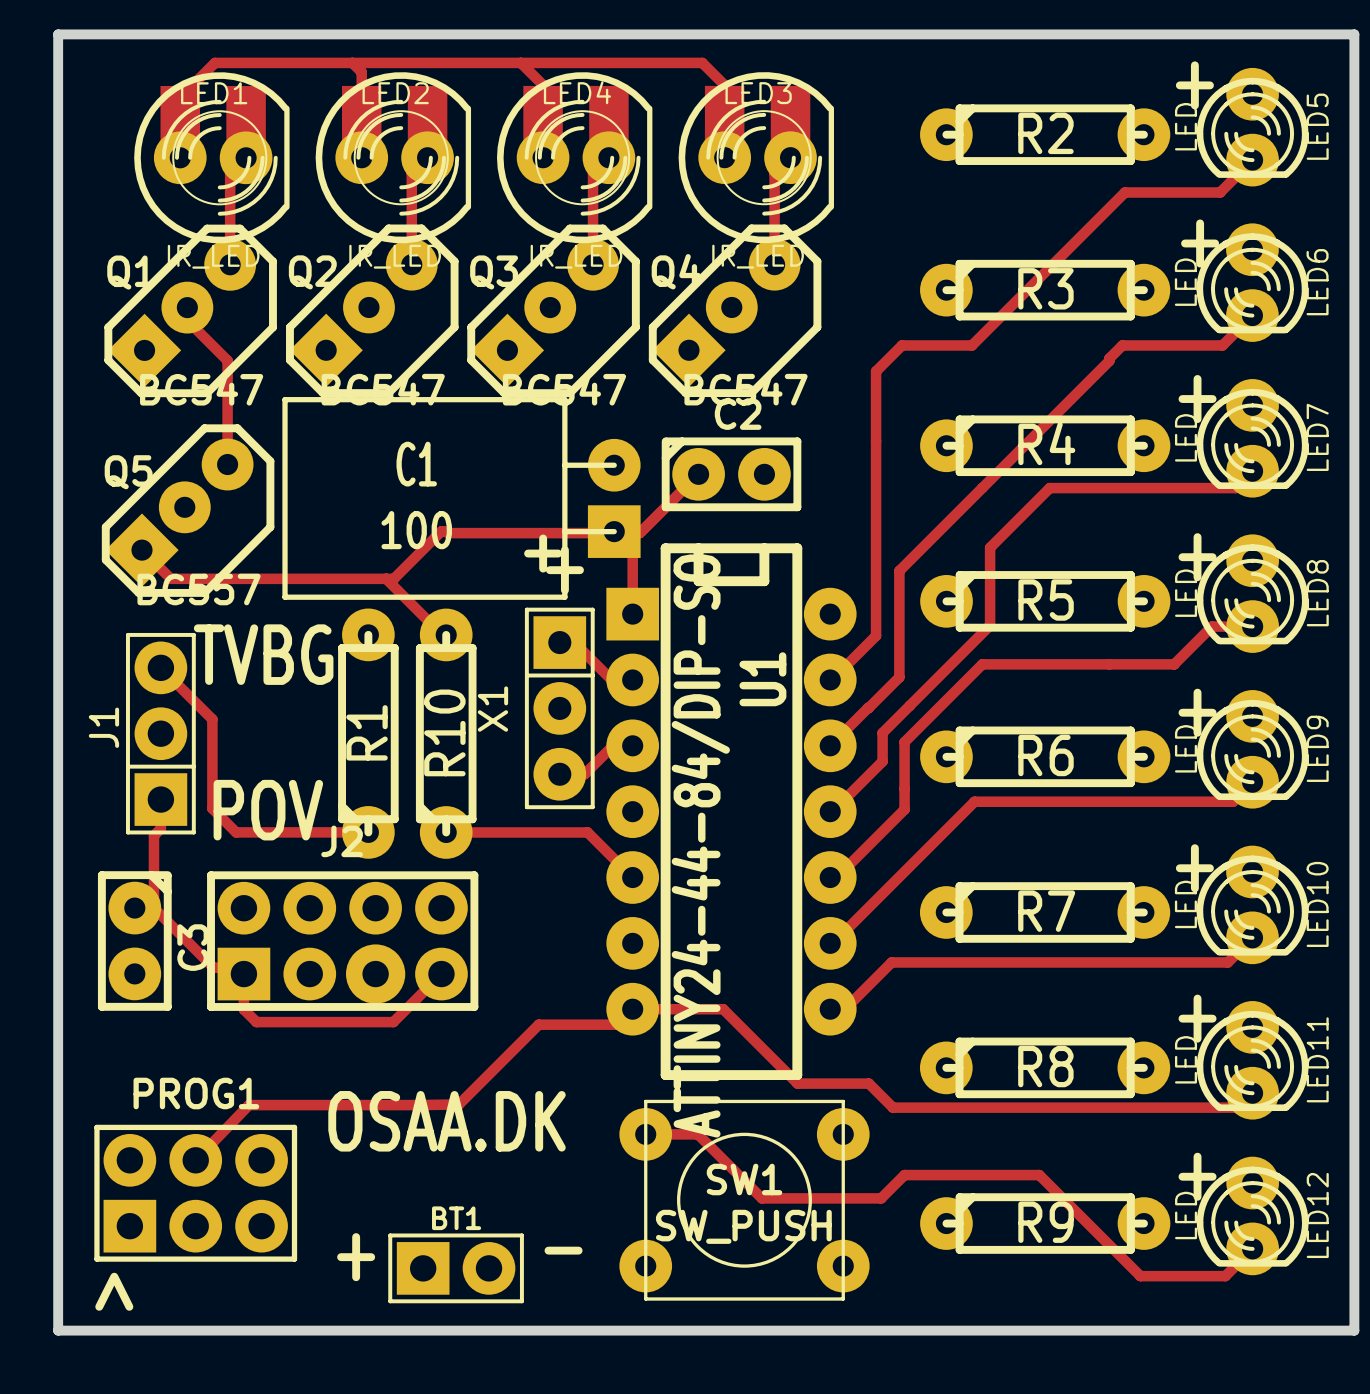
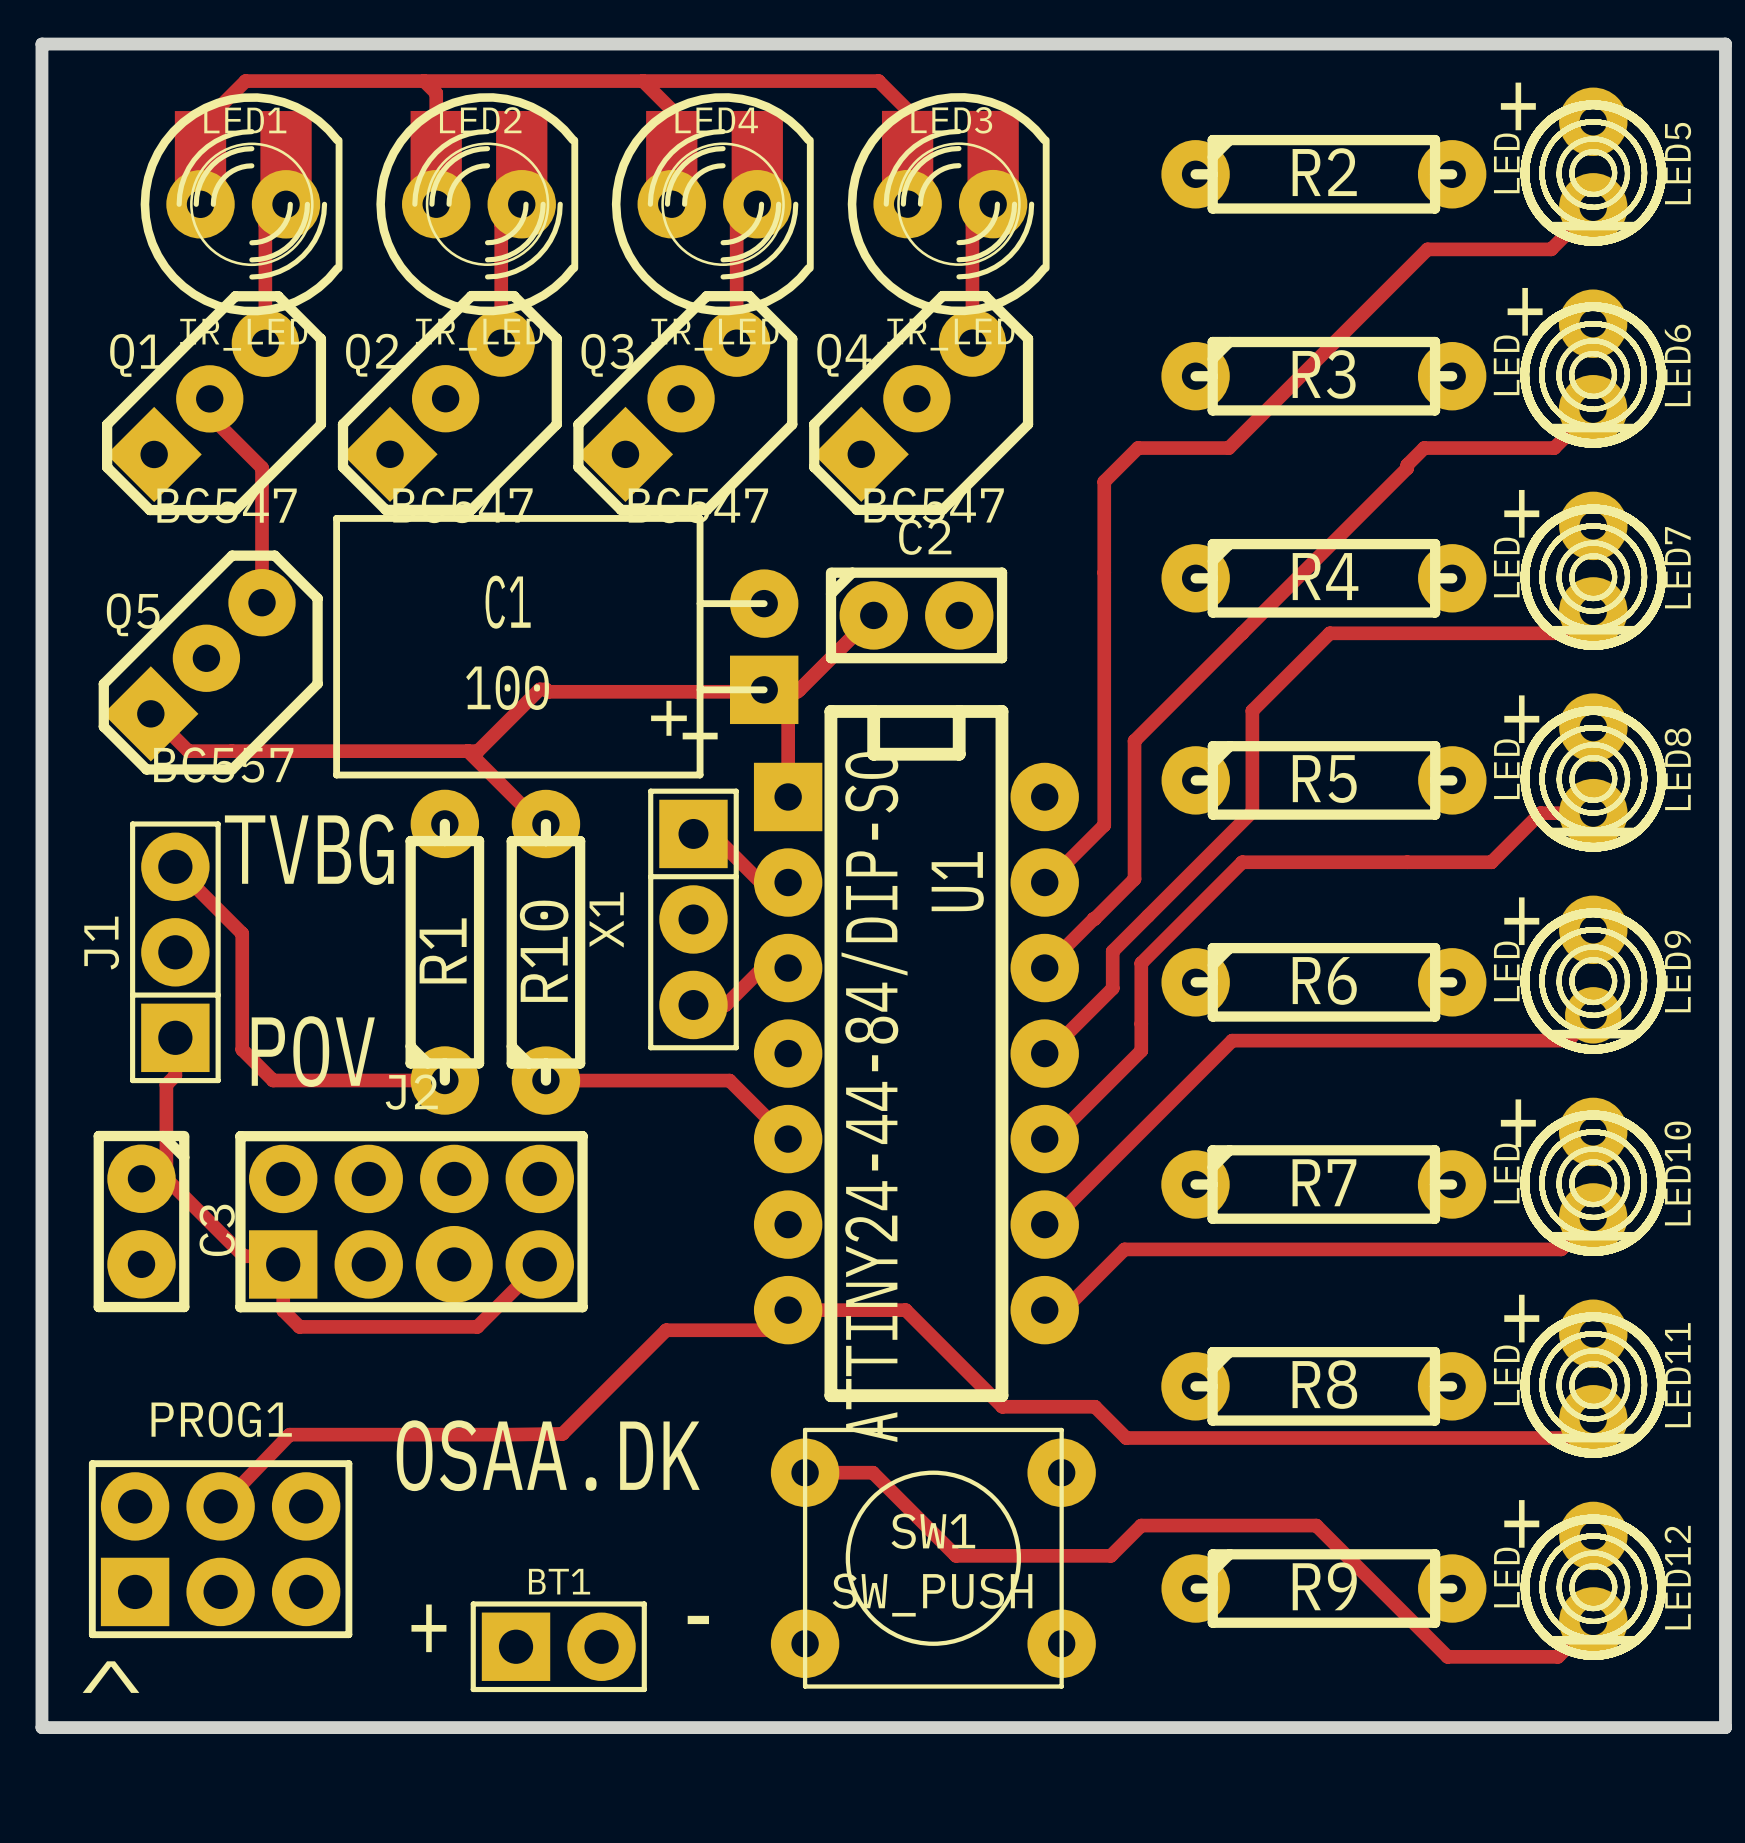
LED5 footprint: [1196, 67, 1309, 187] -> [1520, 87, 1666, 246]
LED6 footprint: [1196, 223, 1309, 342] -> [1520, 289, 1666, 448]
LED7 footprint: [1196, 379, 1309, 498] -> [1520, 491, 1666, 650]
LED8 footprint: [1196, 534, 1309, 653] -> [1520, 693, 1667, 852]
LED9 footprint: [1196, 690, 1309, 809] -> [1520, 895, 1666, 1054]
LED10 footprint: [1196, 845, 1309, 965] -> [1520, 1097, 1666, 1256]
LED11 footprint: [1196, 1001, 1309, 1120] -> [1520, 1299, 1666, 1458]
LED12 footprint: [1196, 1156, 1309, 1276] -> [1520, 1501, 1667, 1660]

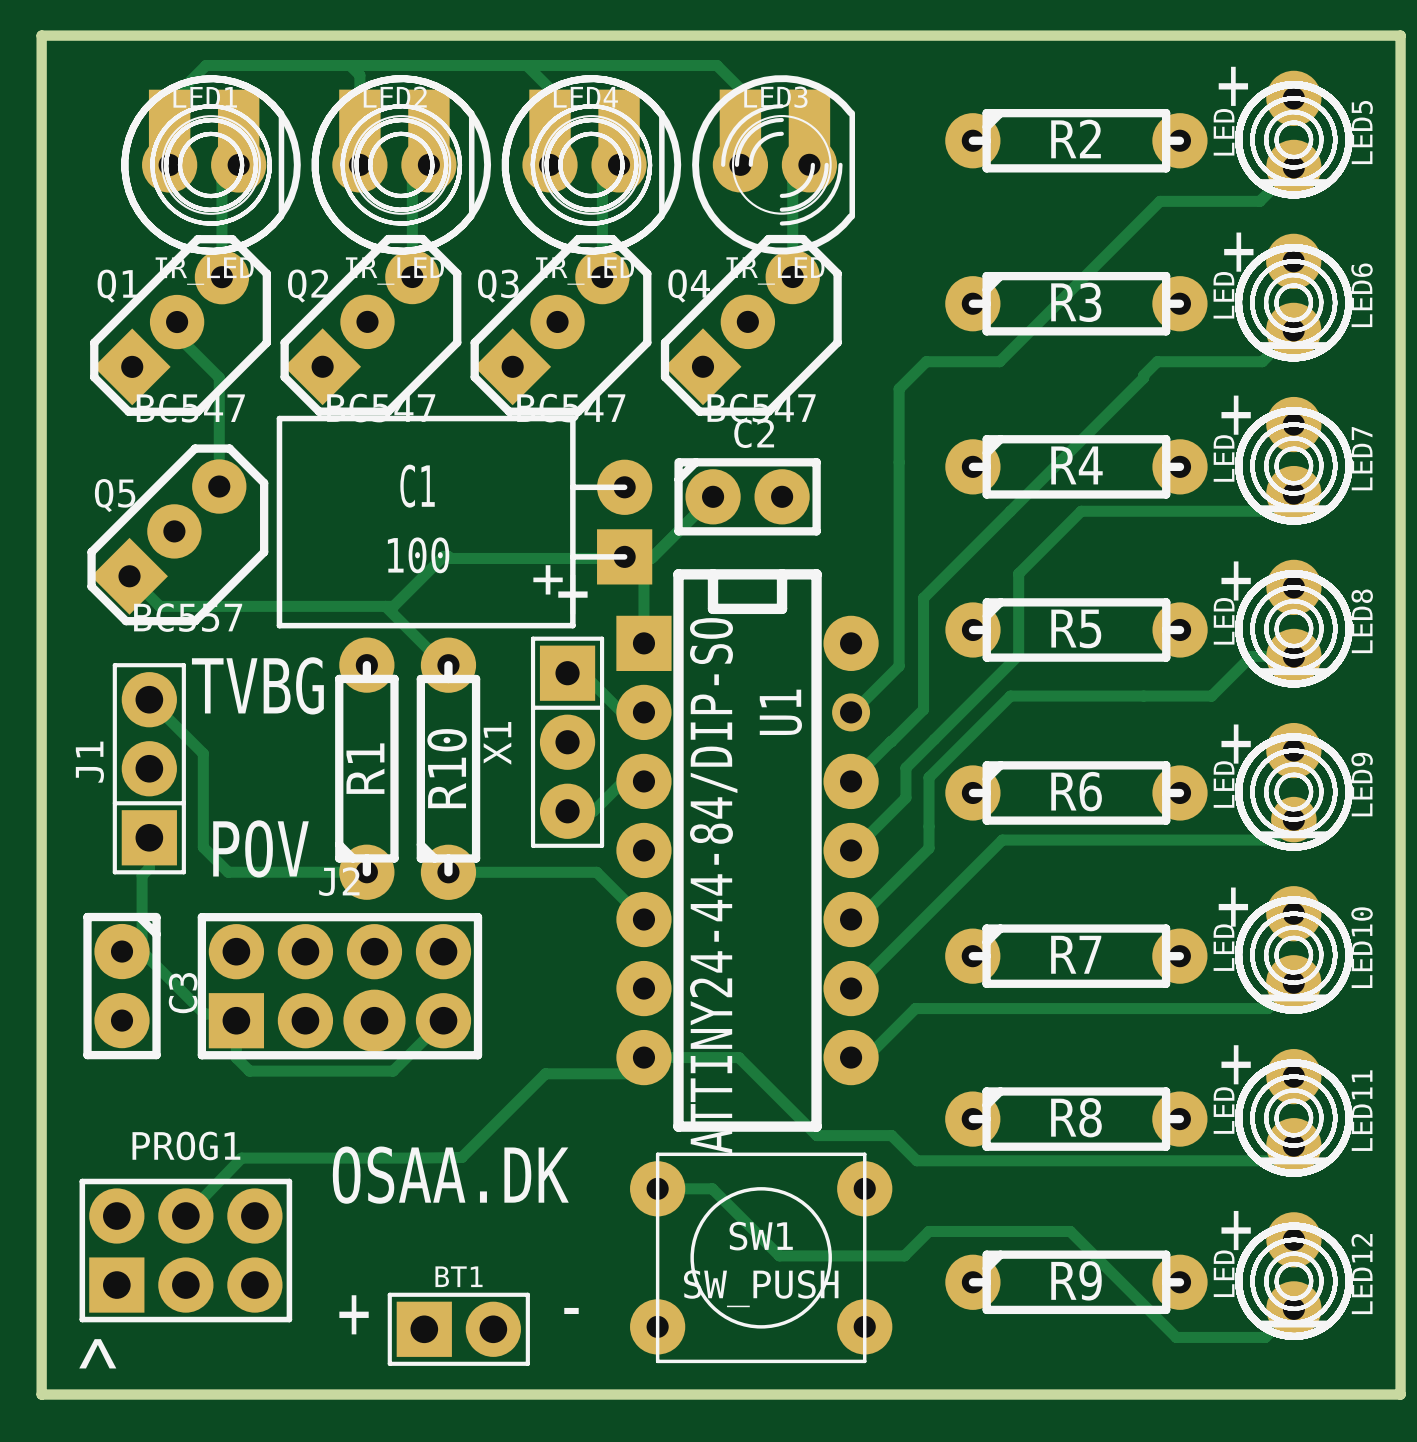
LED1 footprint: [140, 93, 343, 316] -> [121, 75, 301, 255]
LED2 footprint: [376, 93, 579, 316] -> [311, 75, 492, 255]
LED4 footprint: [611, 93, 814, 316] -> [501, 75, 682, 255]
U1 footprint: [753, 705, 1079, 1403] -> [616, 569, 879, 1132]

